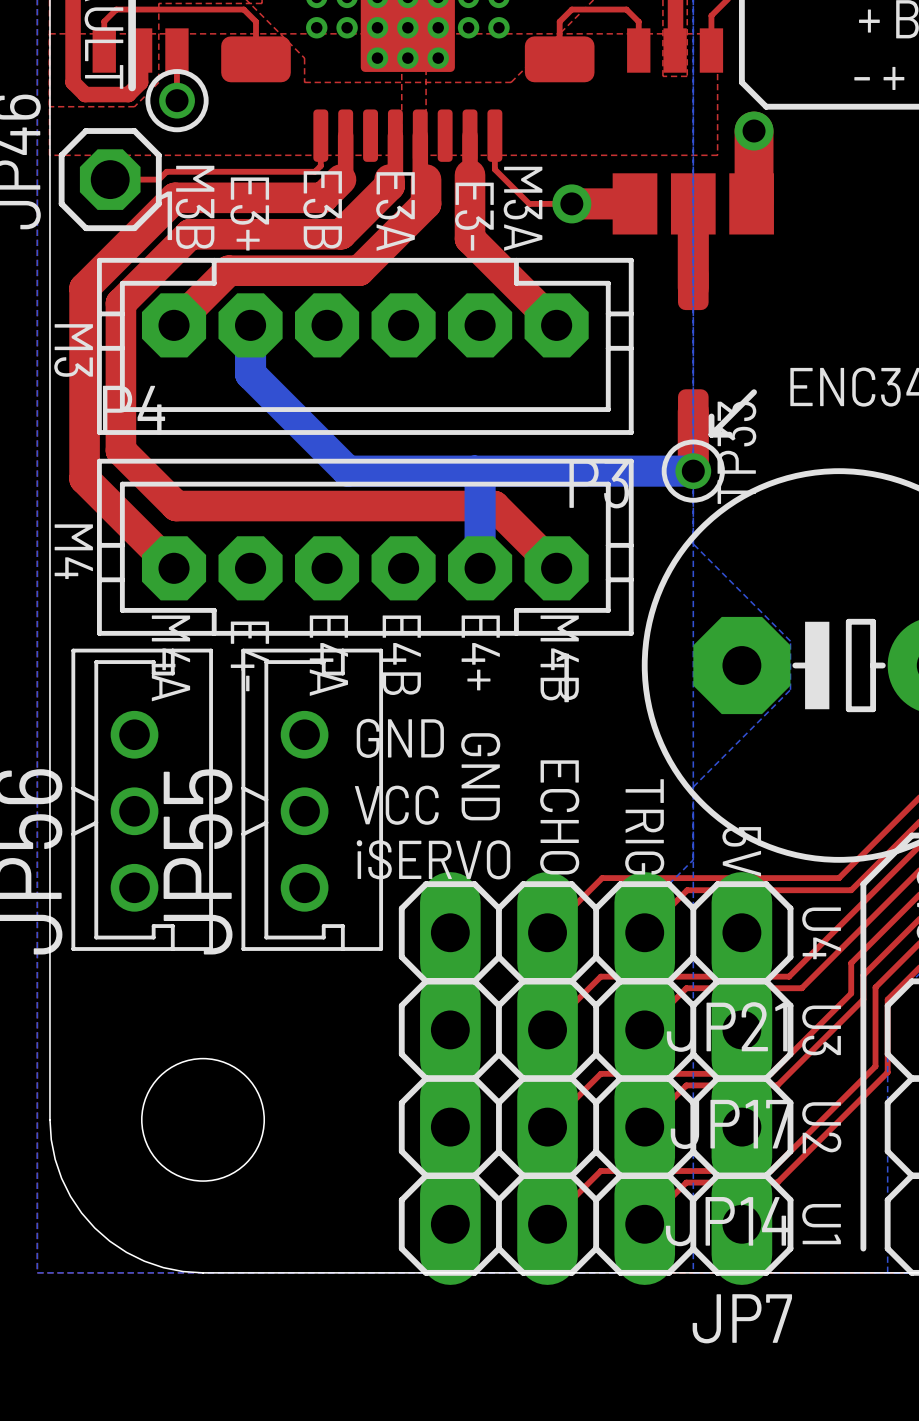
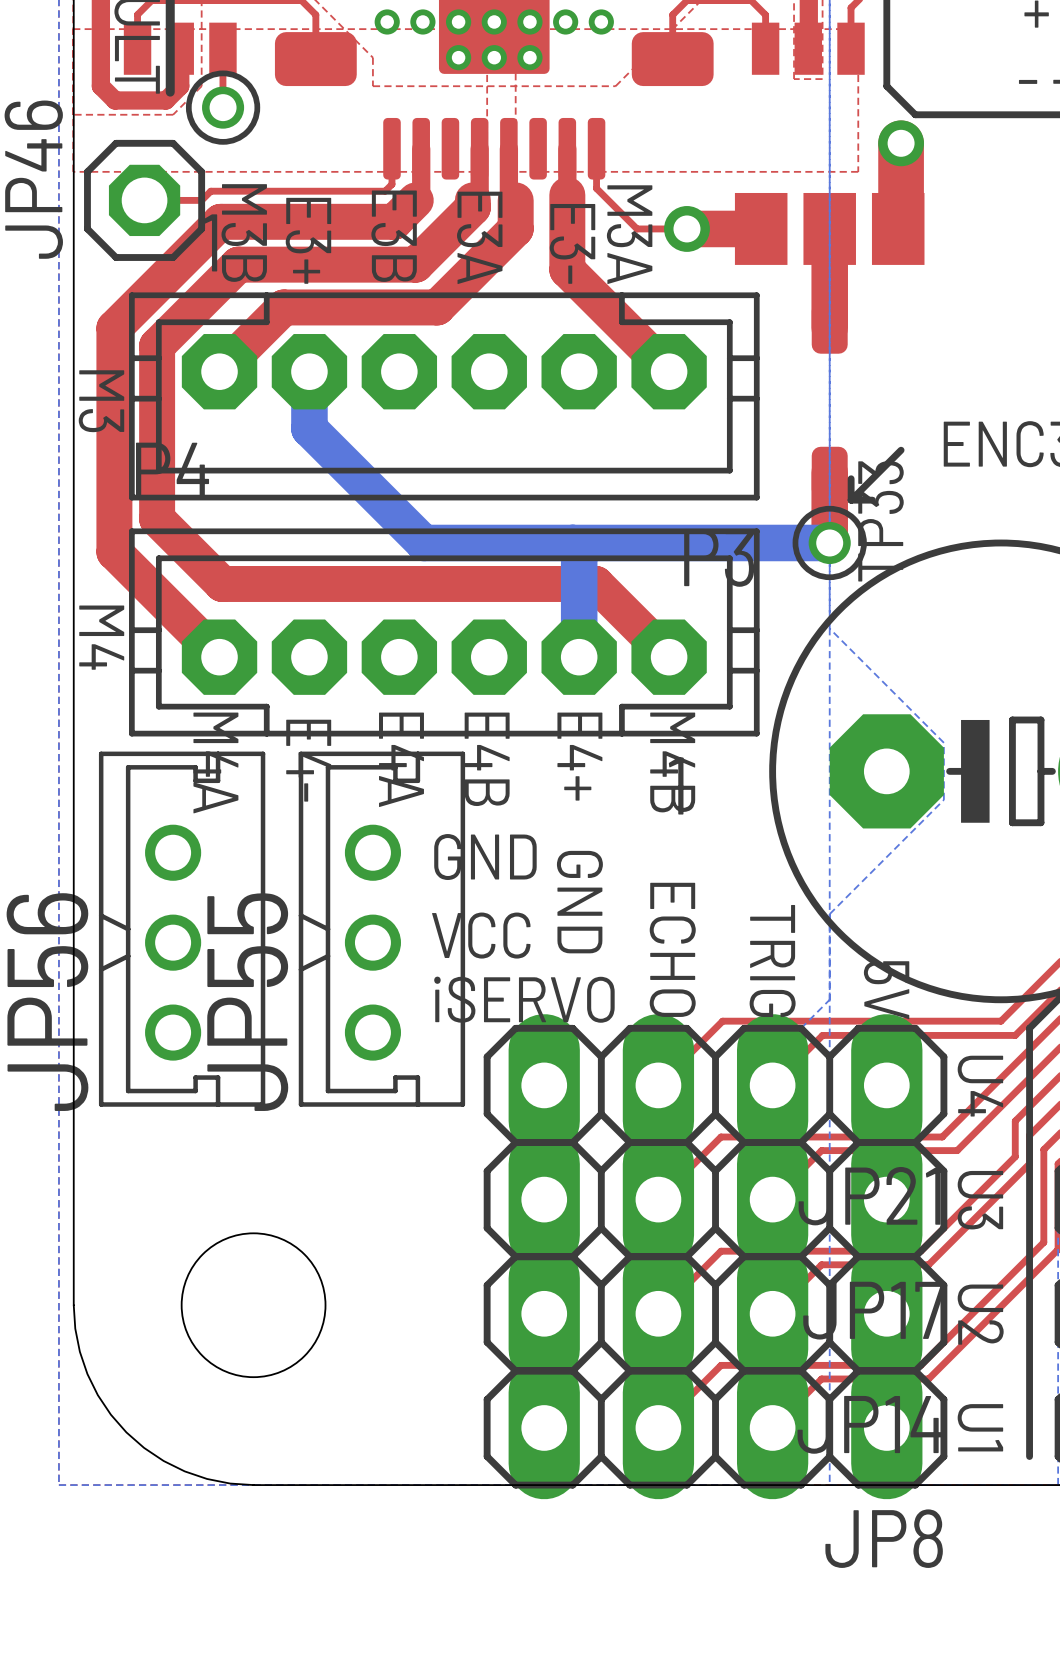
JP7 name: JP7 (742, 1318) -> JP8 (884, 1538)

